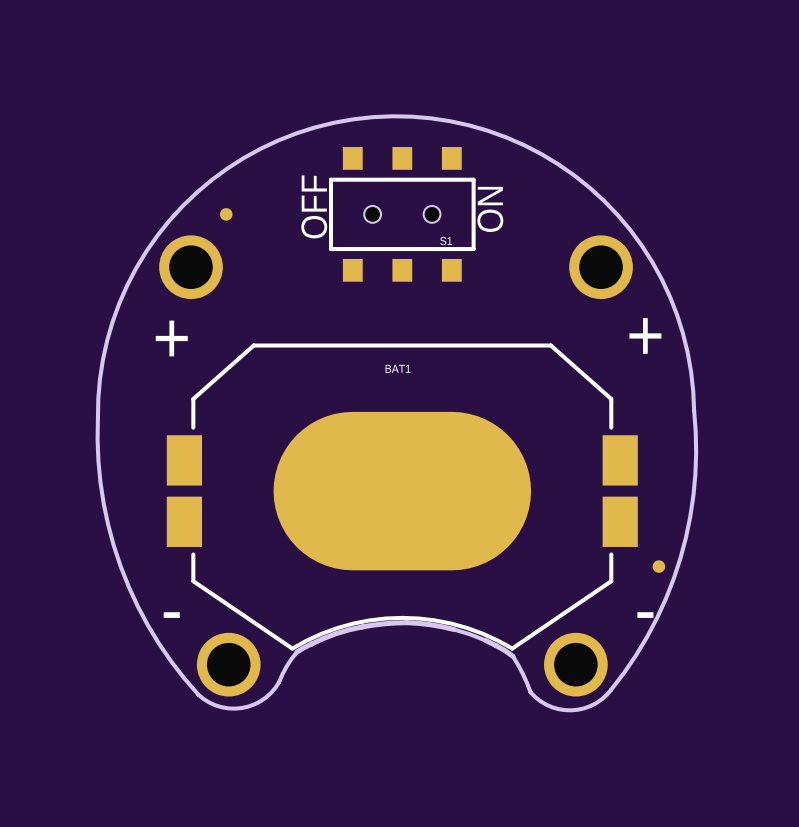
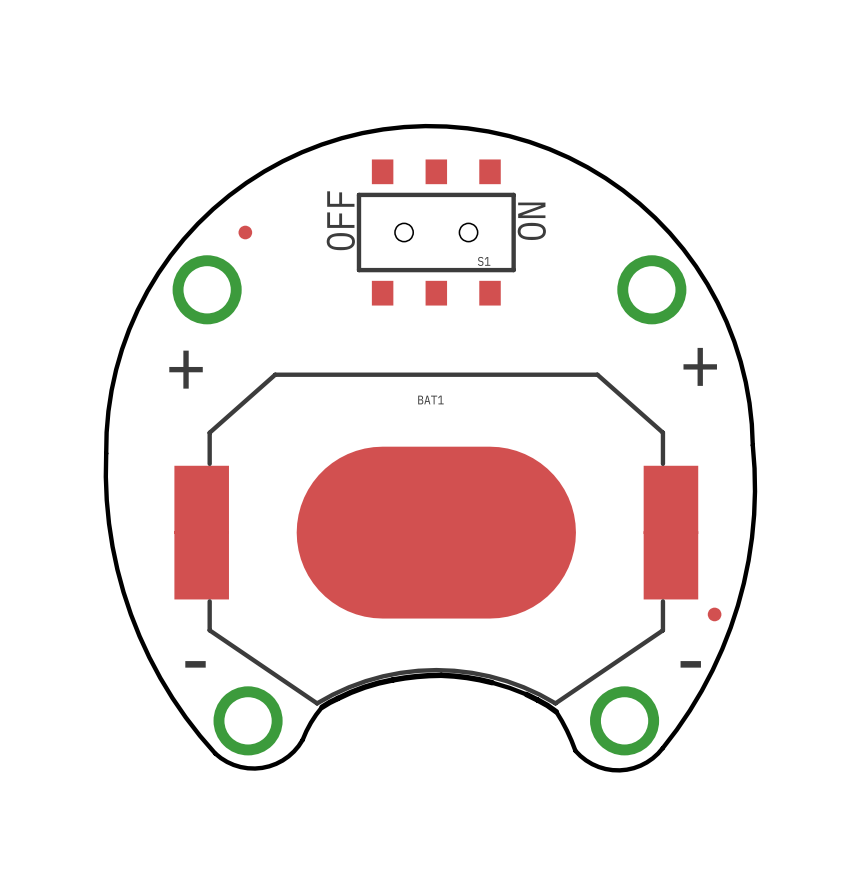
BAT1 footprint: [166, 343, 638, 651] -> [174, 372, 699, 706]

